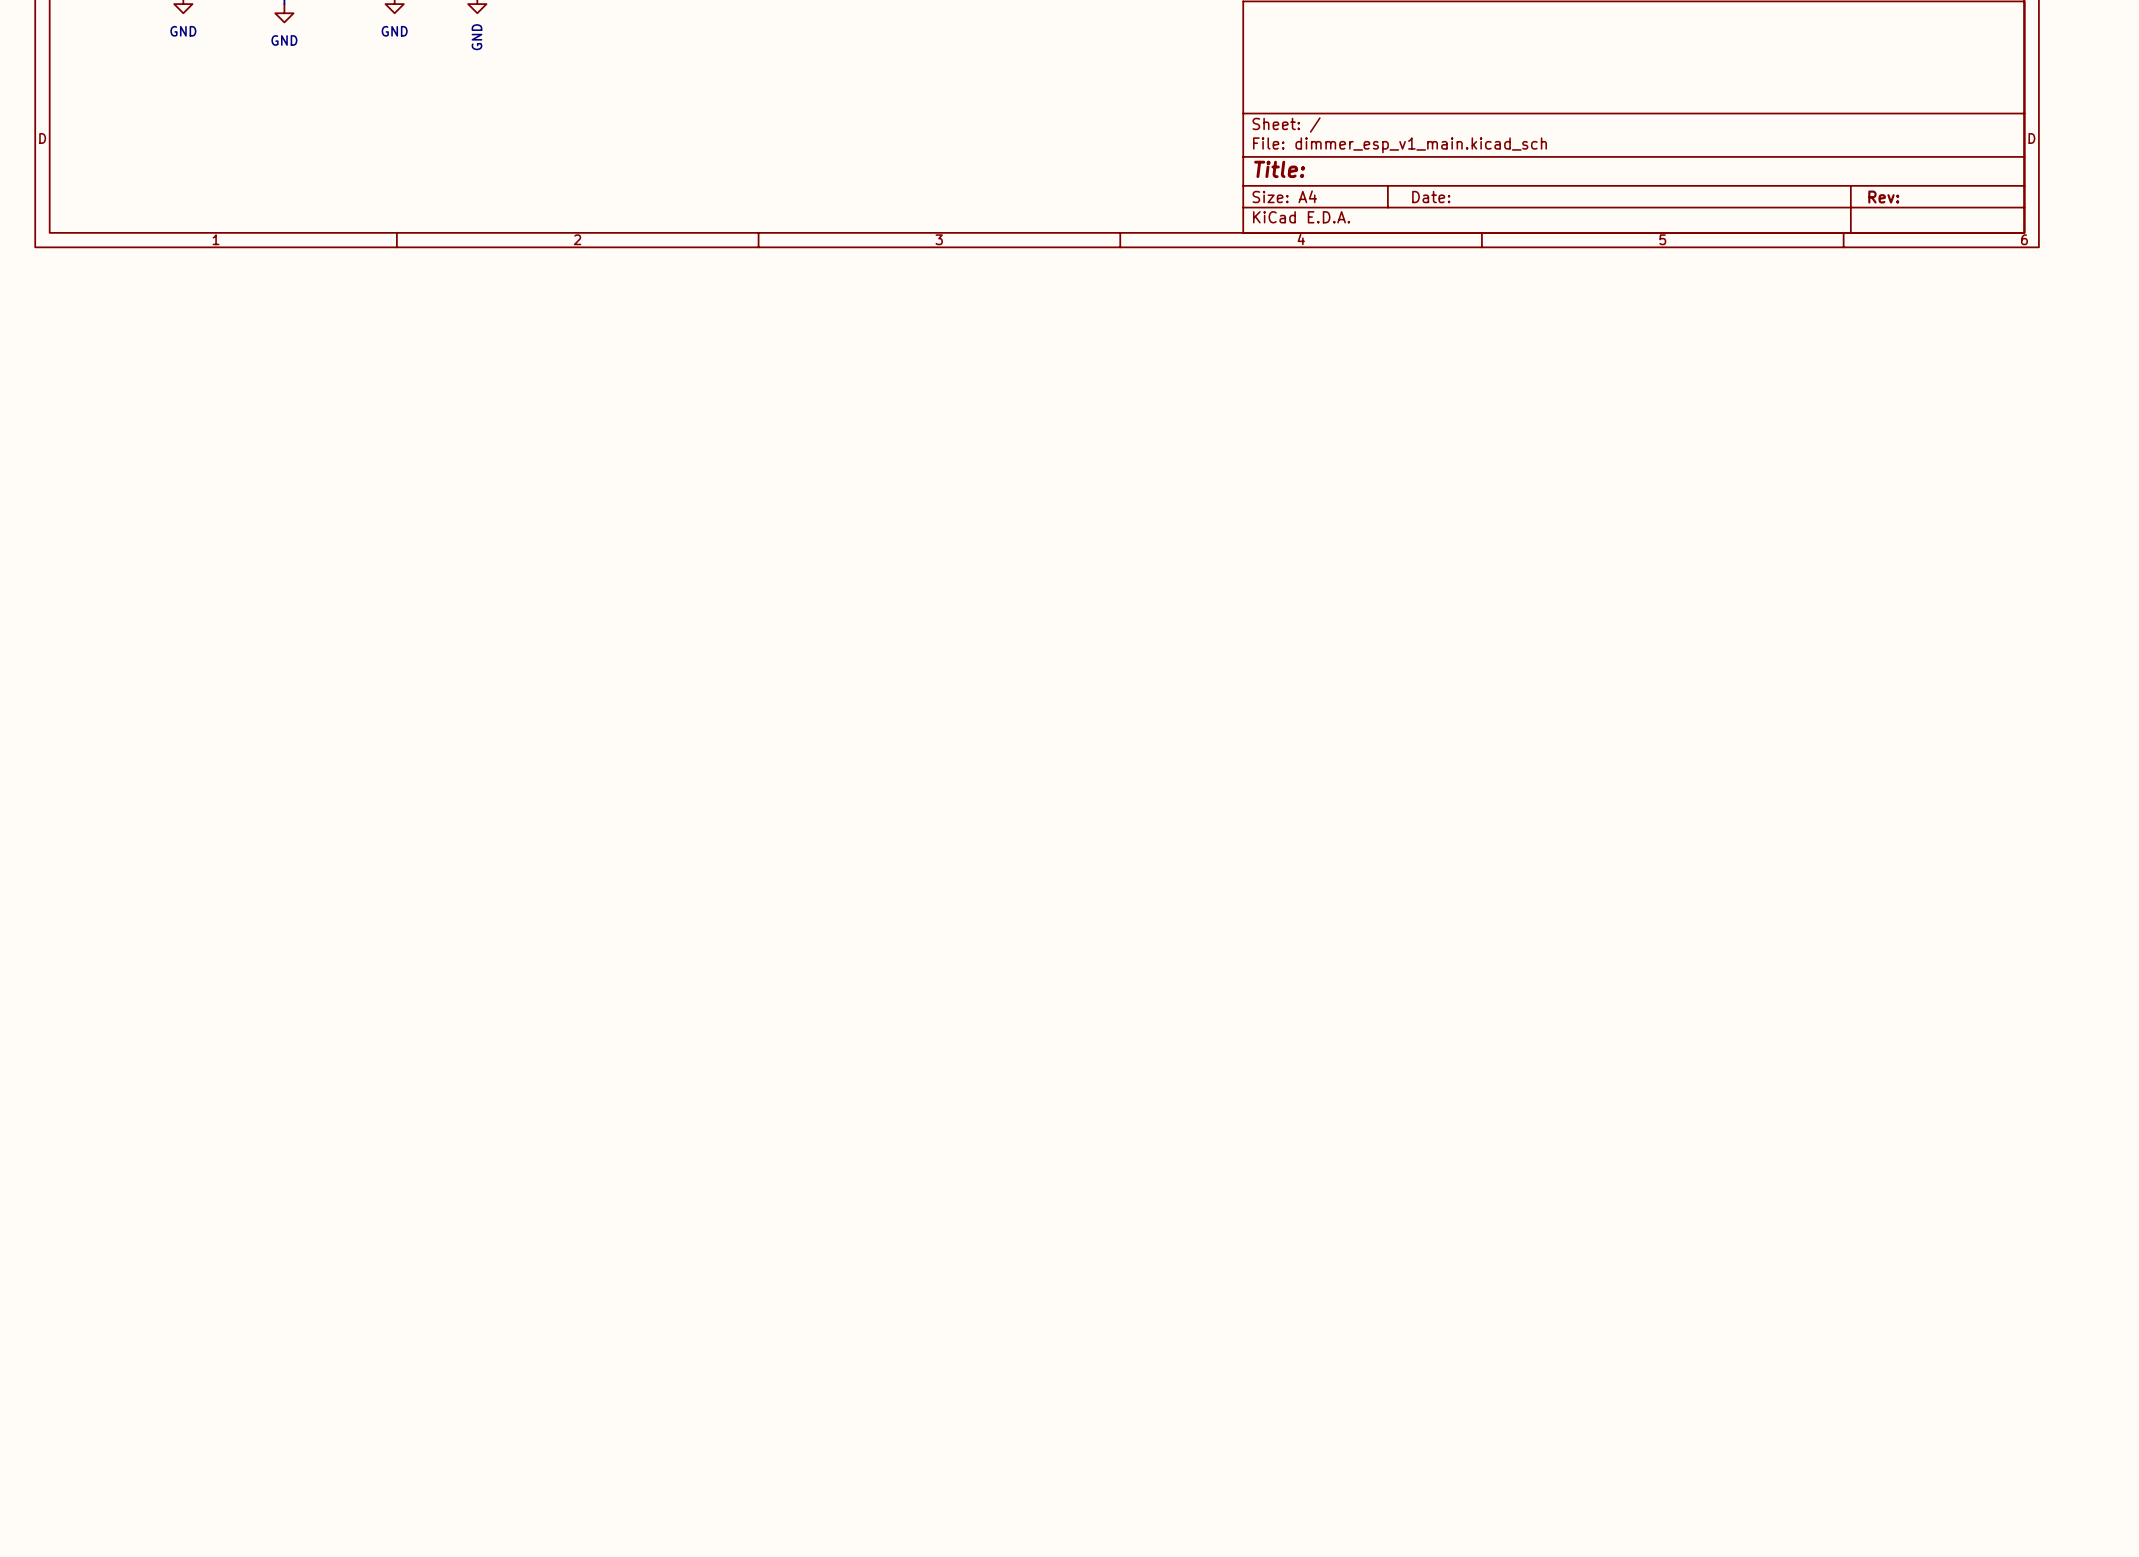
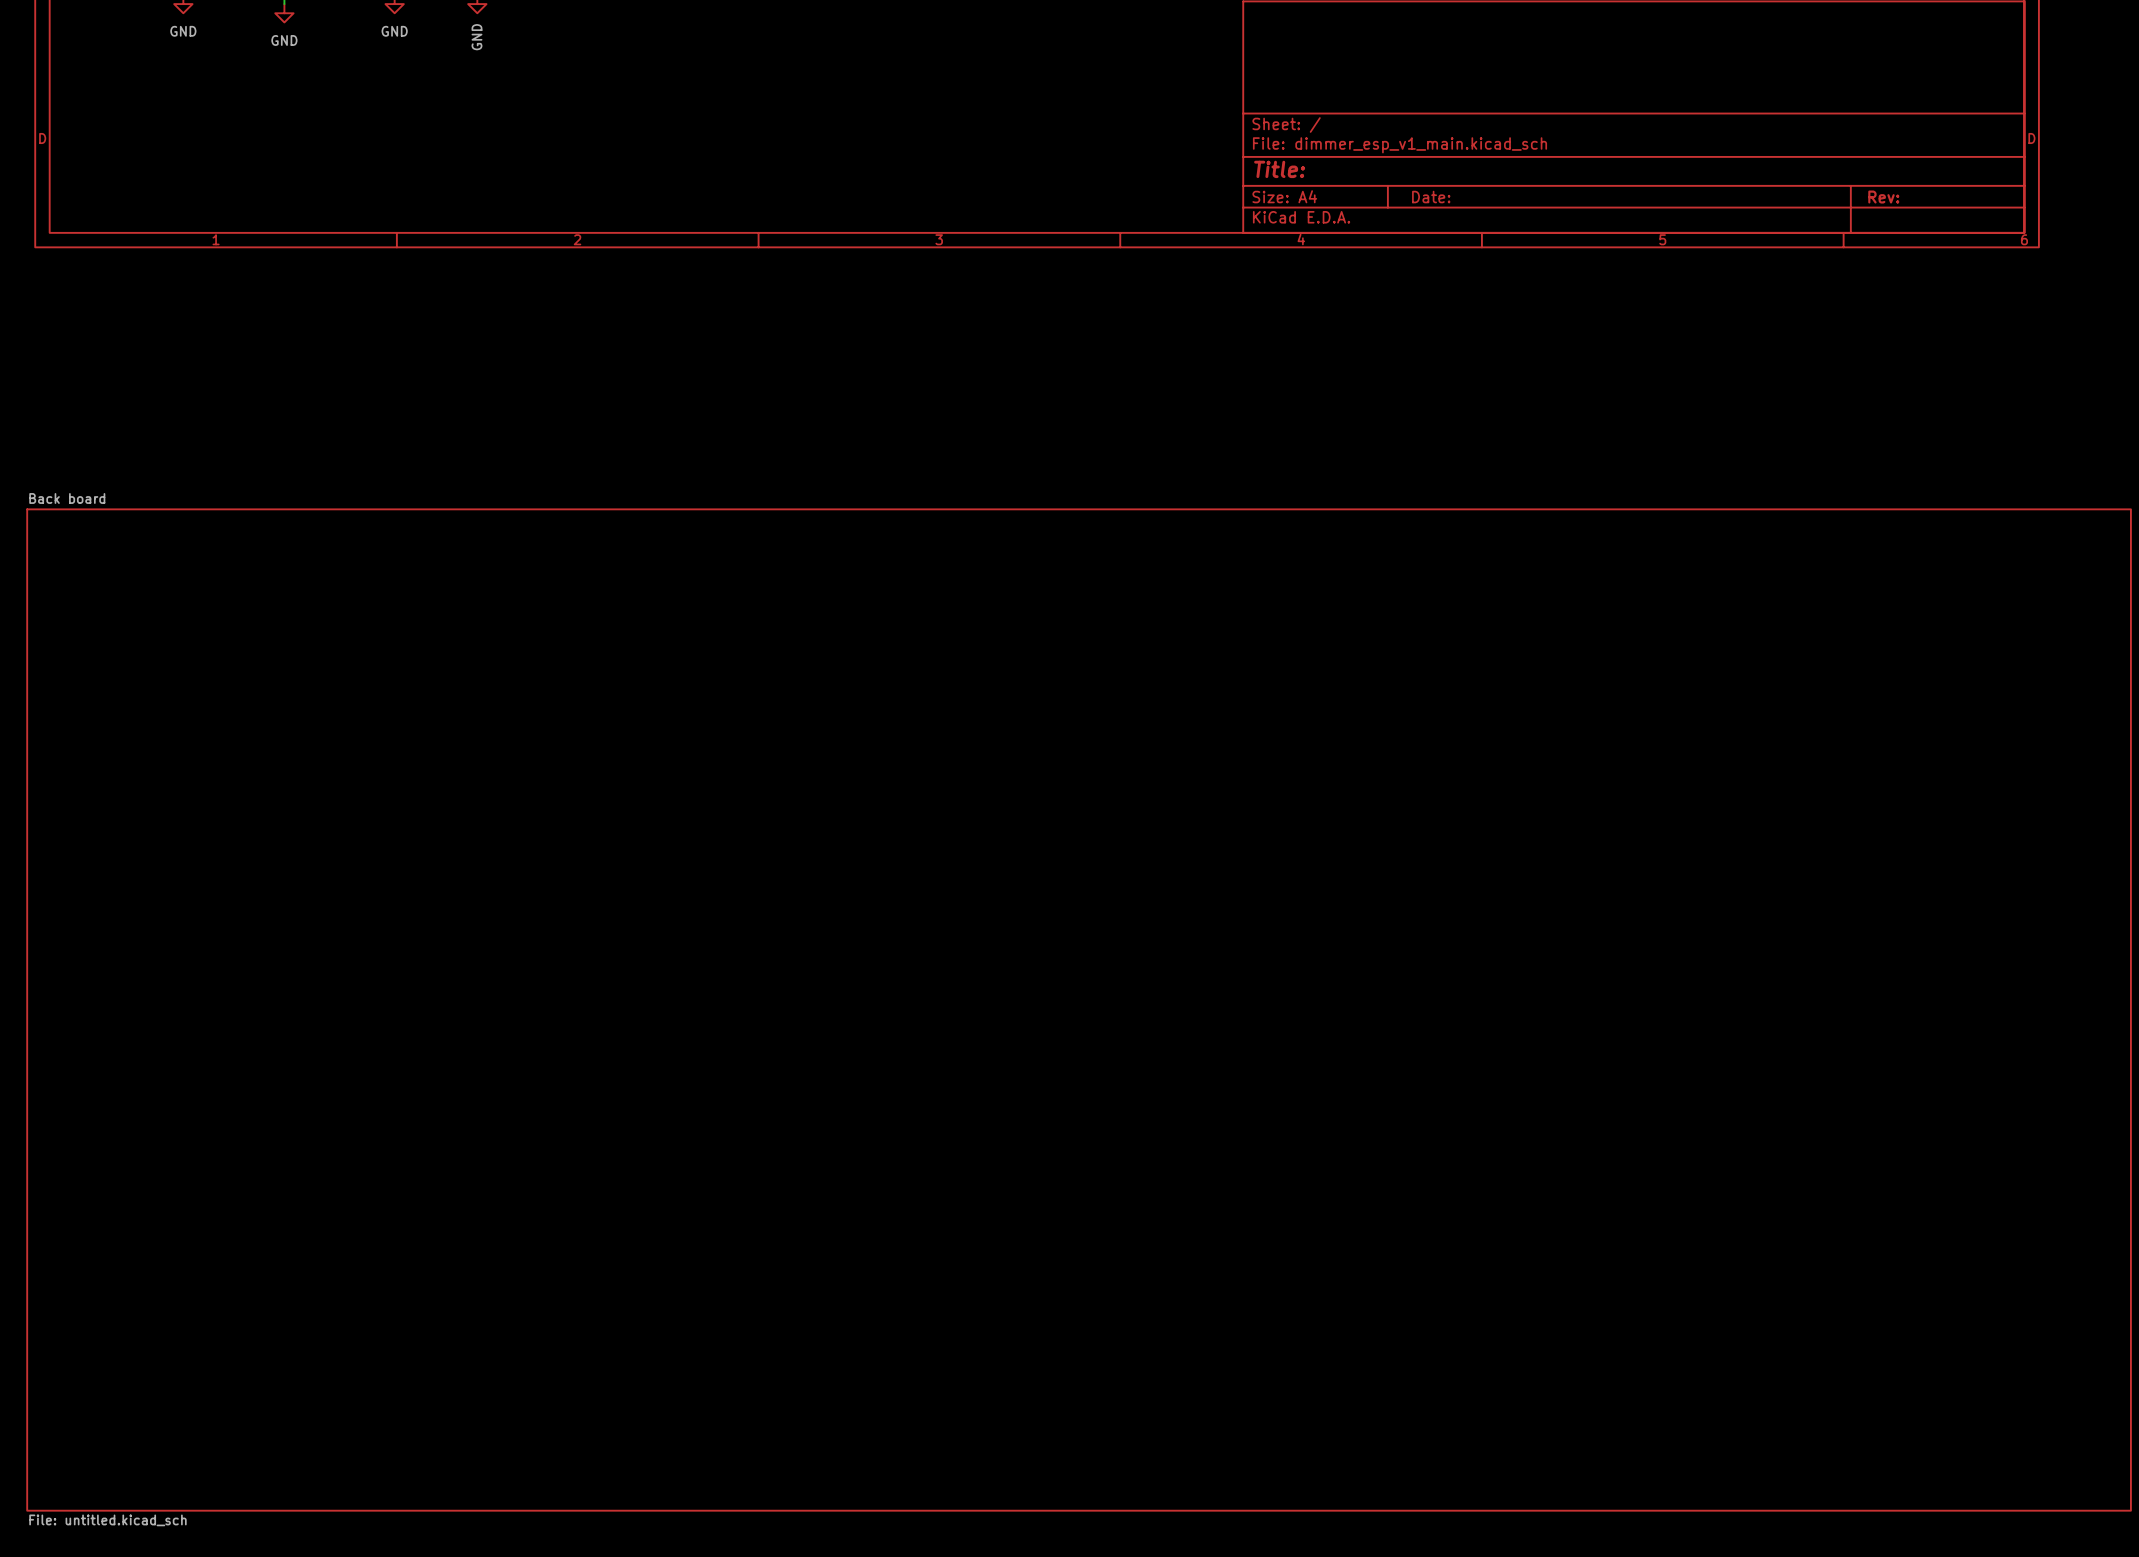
sheet Back board: none -> File: untitled.kicad_sch (1079, 1010)

